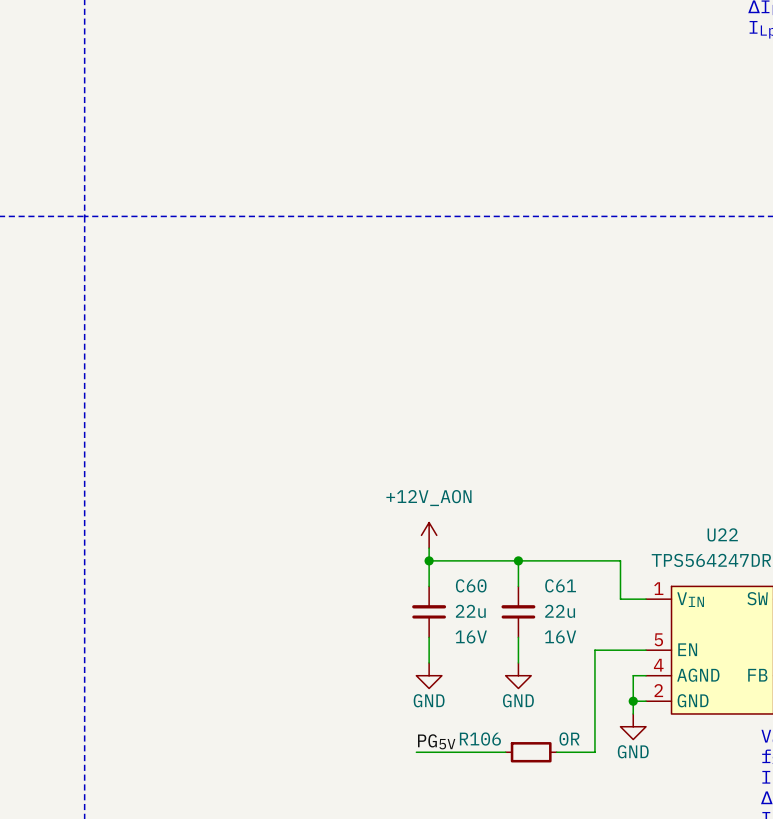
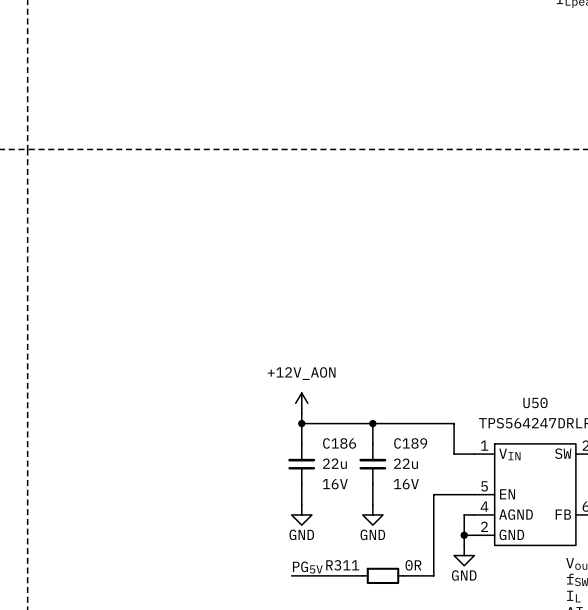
U22 name: U22 (722, 534) -> U50 (535, 402)
C60 name: C60 (471, 585) -> C186 (339, 443)
C61 name: C61 (560, 585) -> C189 (410, 443)
R106 name: R106 (480, 739) -> R311 (342, 565)

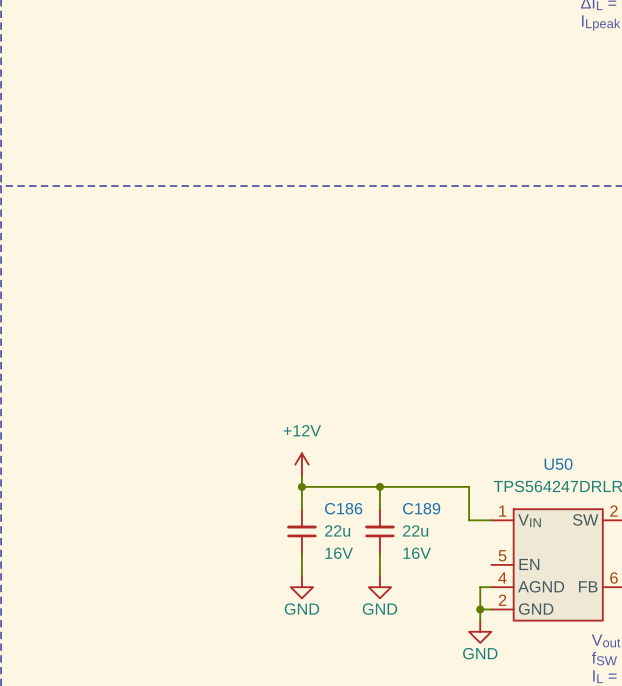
power symbol: +12V_AON (301, 403) -> +12V (301, 464)
wire: (474, 494) (433, 494) (433, 575) (403, 575) -> none
label: PG5V (307, 567) -> none
wire: (291, 575) (362, 575) -> none
R311: (383, 575) -> none

